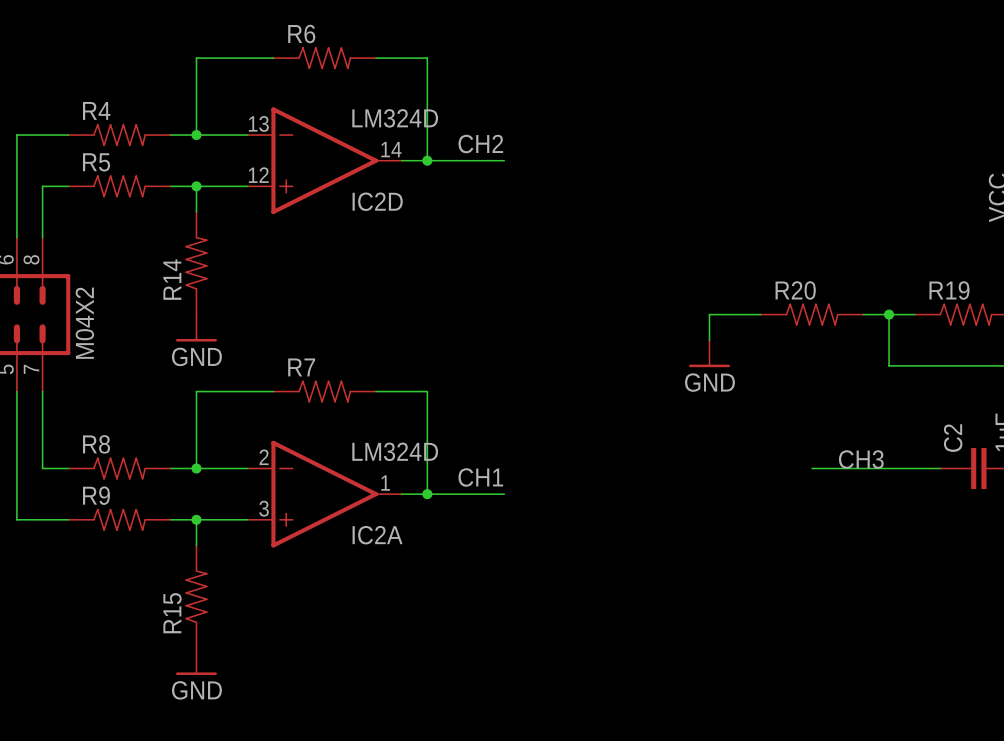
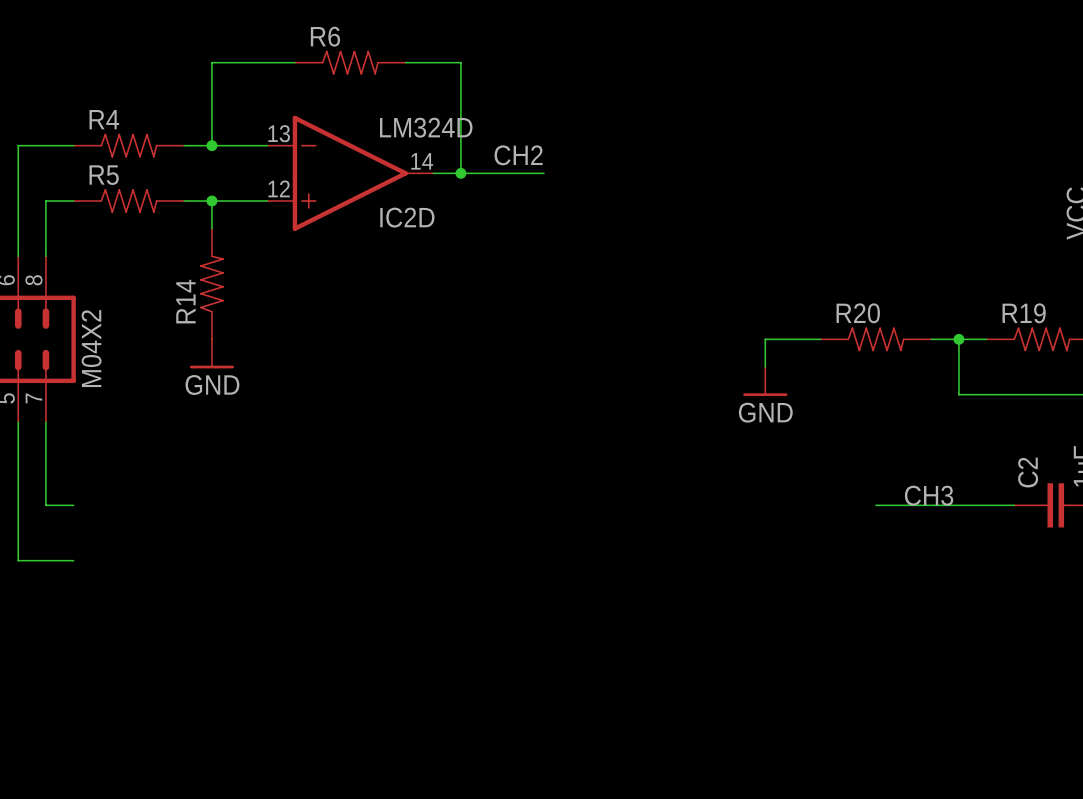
wire: (273, 391) (196, 391) (196, 468) -> none
R7: (324, 391) -> none
wire: (376, 391) (427, 391) (427, 494) -> none
R8: (119, 468) -> none
wire: (170, 468) (247, 468) -> none
junction: (196, 468) -> none
label: CH1 (480, 477) -> none
IC2A: LM324D (324, 494) -> none
wire: (401, 494) (504, 494) -> none
junction: (427, 494) -> none
R9: (119, 519) -> none
wire: (170, 519) (247, 519) -> none
wire: (196, 519) (196, 545) -> none
junction: (196, 519) -> none
R15: (196, 596) -> none
power symbol: GND (196, 661) -> none

